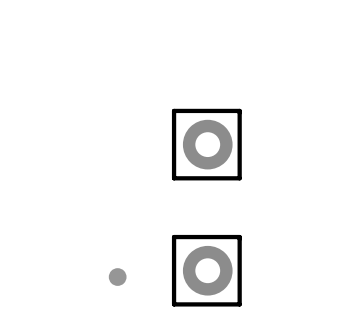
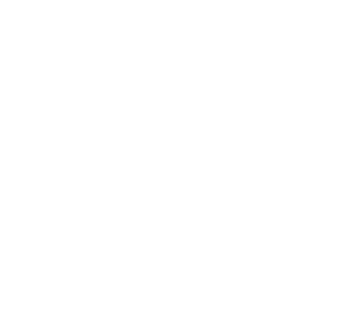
part: (206, 144) -> none
part: (206, 270) -> none
part: (117, 277) -> none

